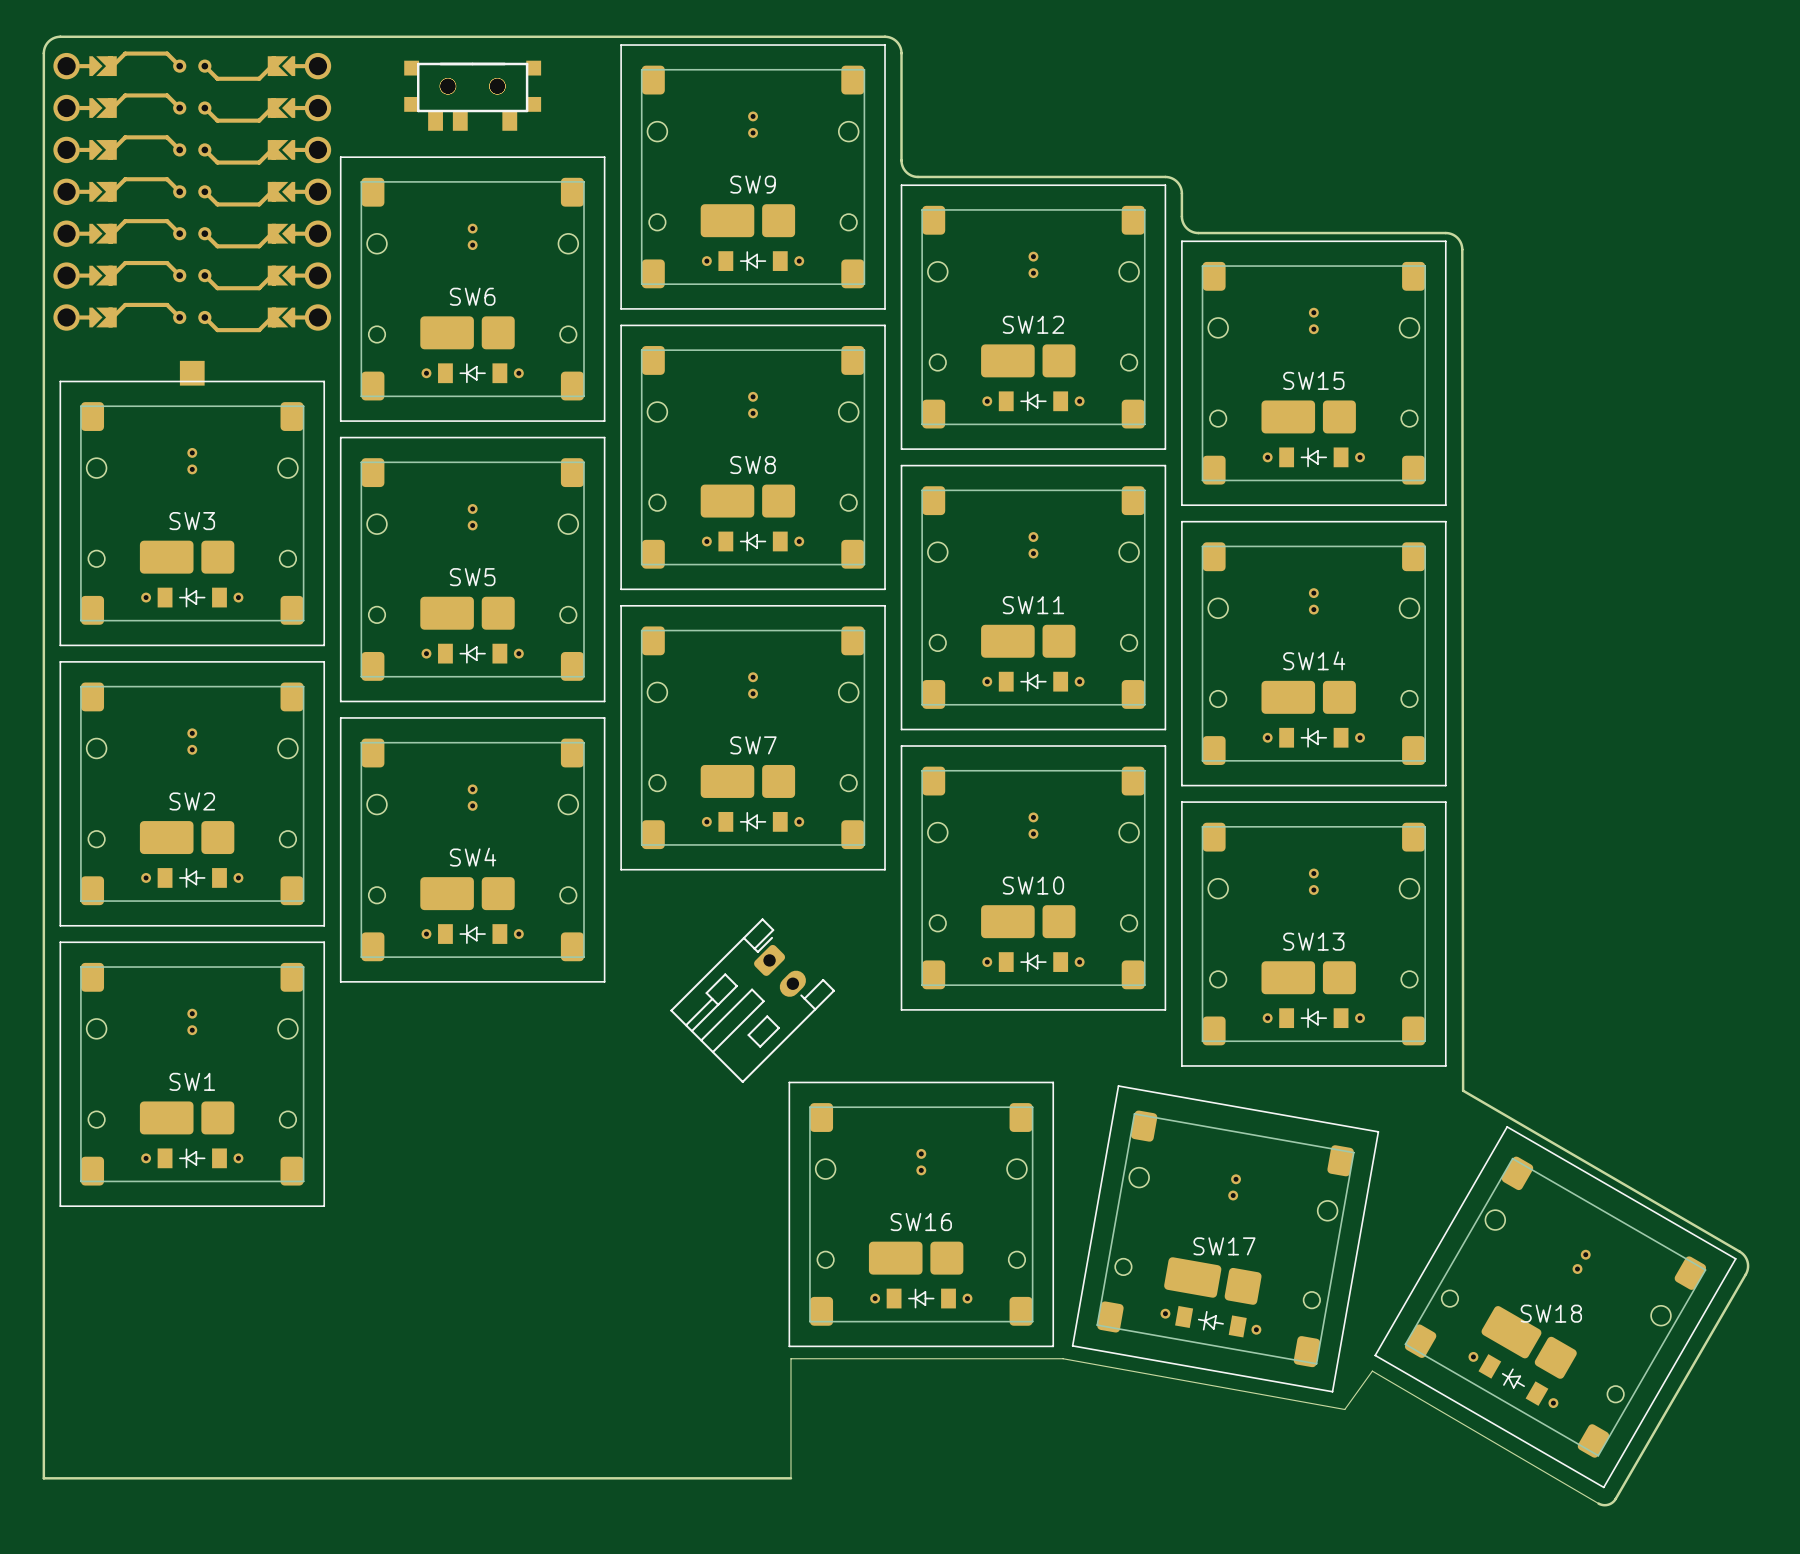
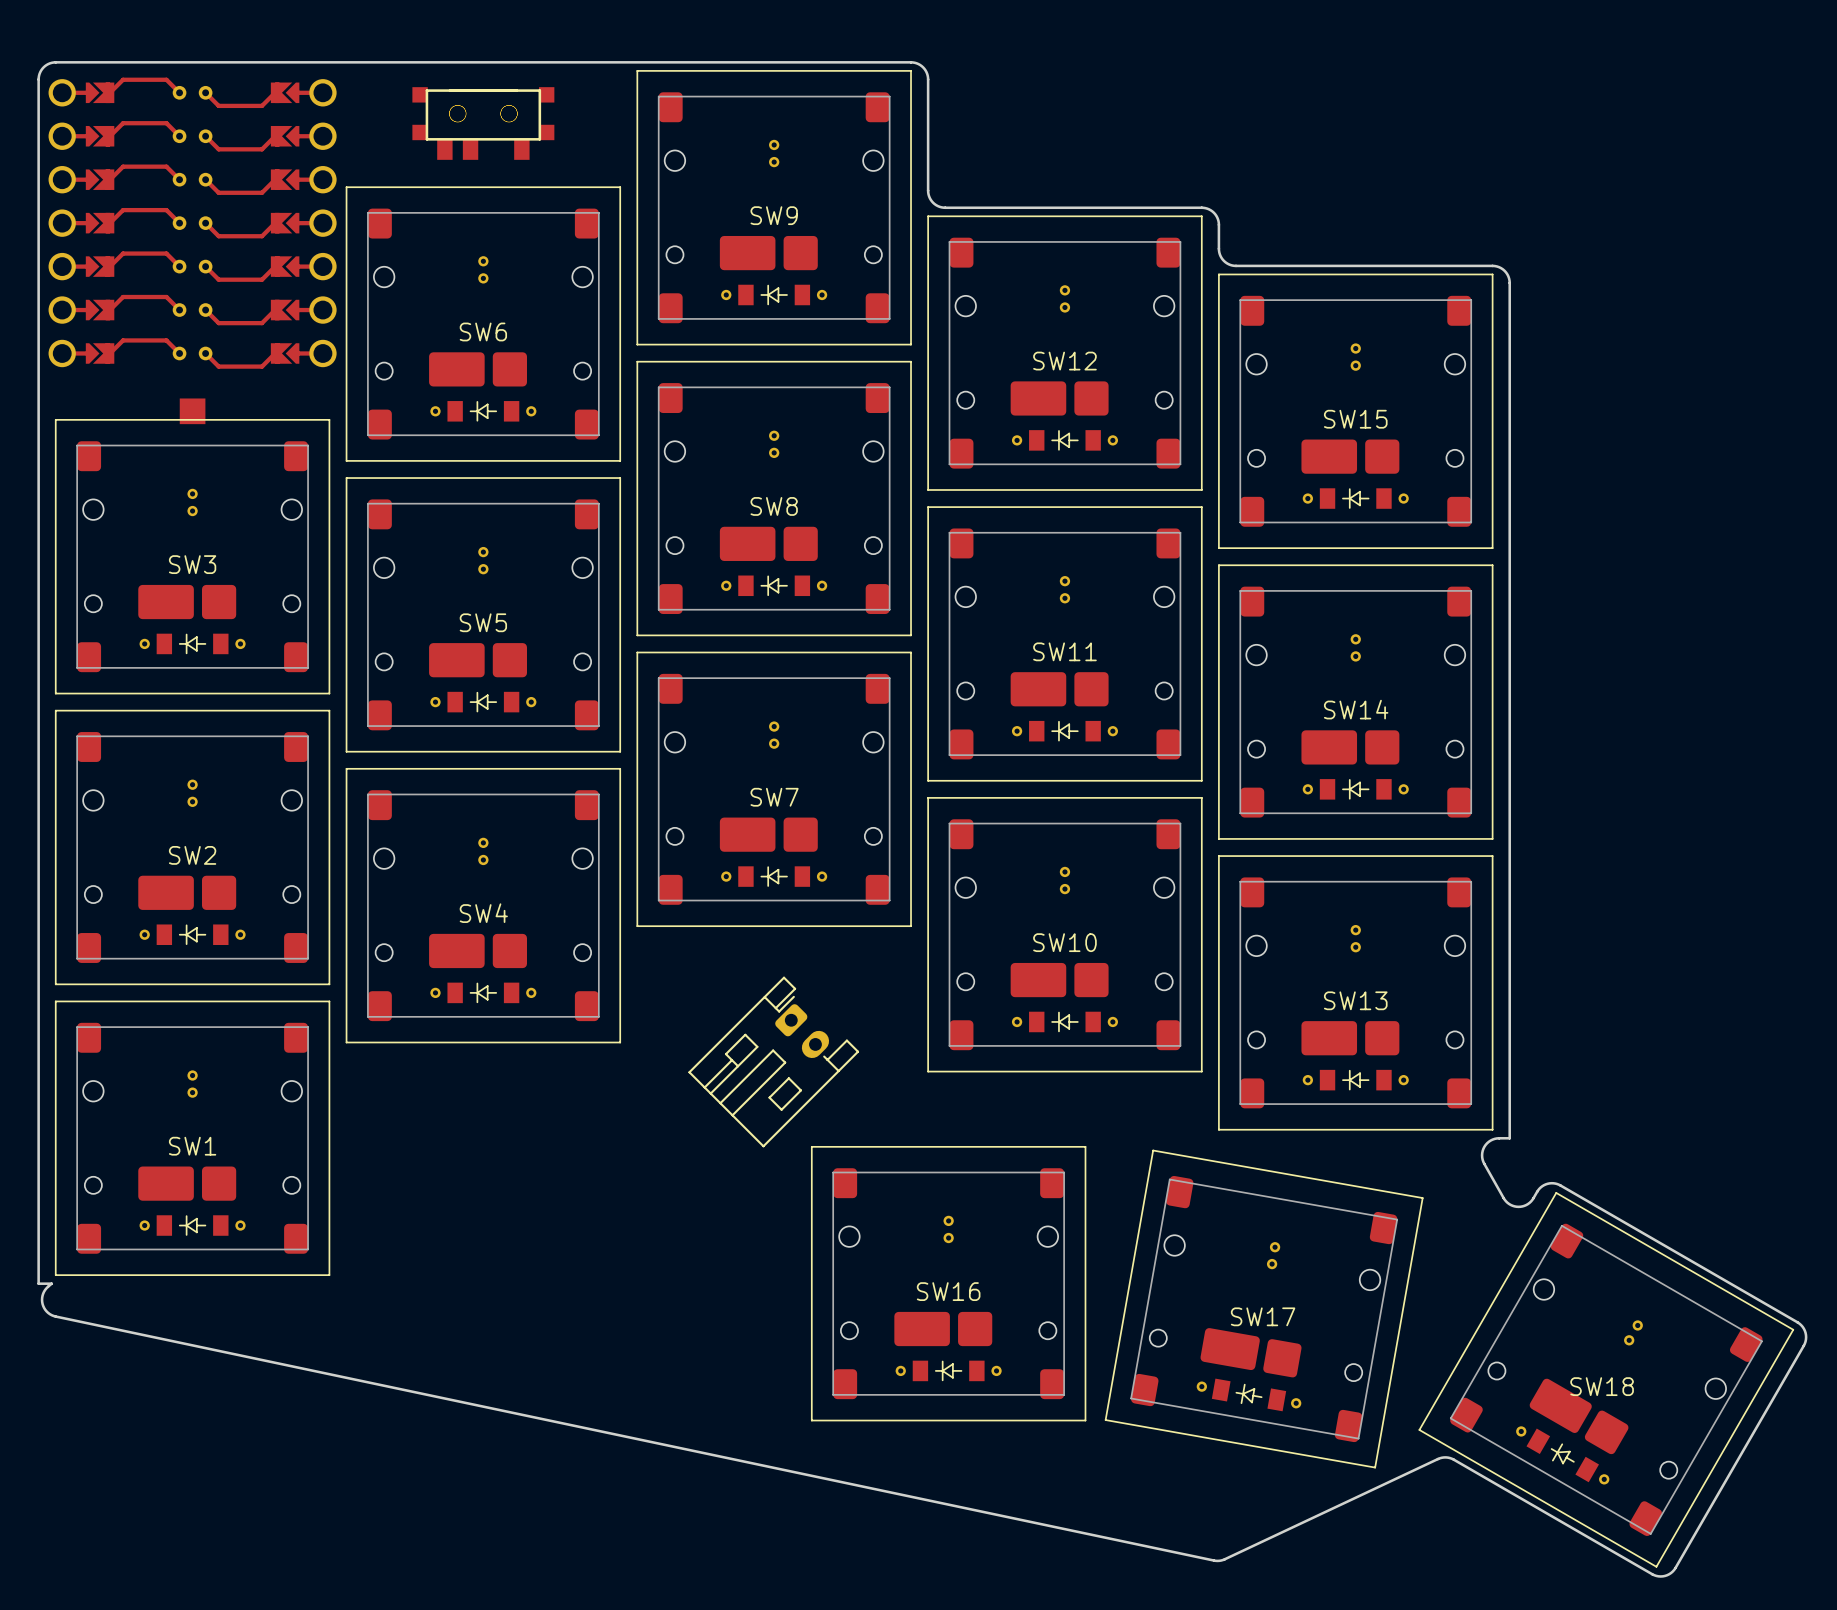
board edge: (1445, 233) (1457, 237) (1462, 249) (1463, 1090) (1739, 1251) (1745, 1256) (1747, 1263) (1745, 1274) (1612, 1502) (1606, 1505) (1598, 1503) (1372, 1371) (1344, 1409) (1063, 1358) (790, 1358) (790, 1478) (43, 1478) (43, 1214) -> (1492, 265) (1504, 270) (1509, 283) (1509, 1138) (1496, 1138) (1488, 1141) (1482, 1150) (1482, 1159) (1503, 1198) (1510, 1204) (1524, 1205) (1531, 1201) (1542, 1186) (1549, 1183) (1558, 1184) (1797, 1322) (1802, 1326) (1805, 1334) (1803, 1345) (1671, 1572) (1660, 1576) (1652, 1574) (1448, 1457) (1438, 1459) (1224, 1559) (1215, 1560) (55, 1316) (46, 1311) (42, 1301) (44, 1291) (51, 1283) (38, 1283)

